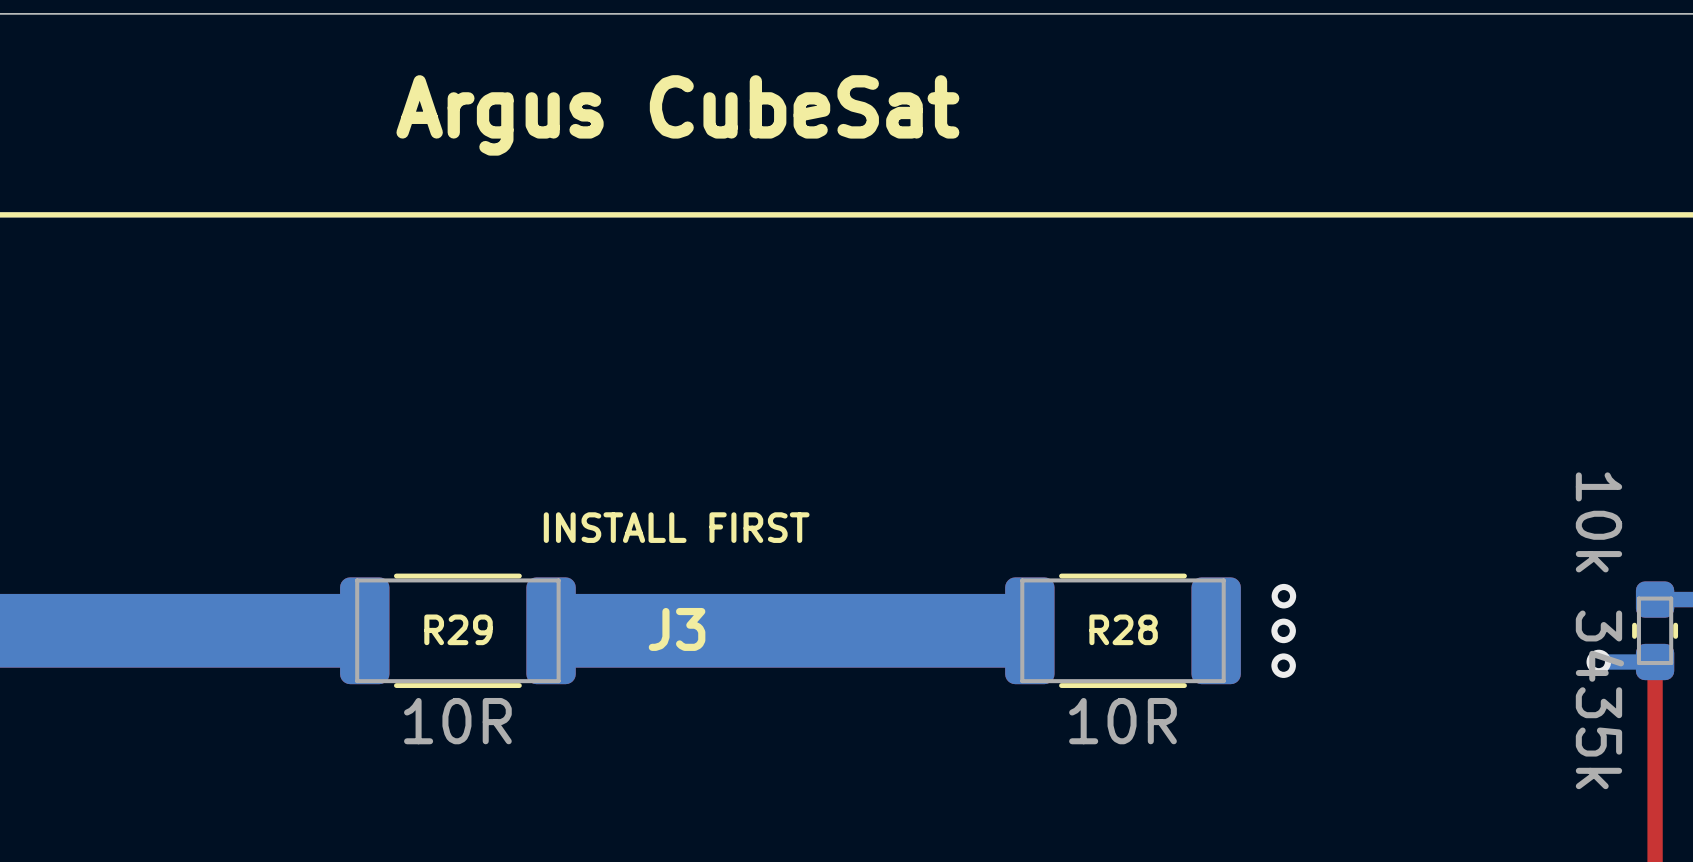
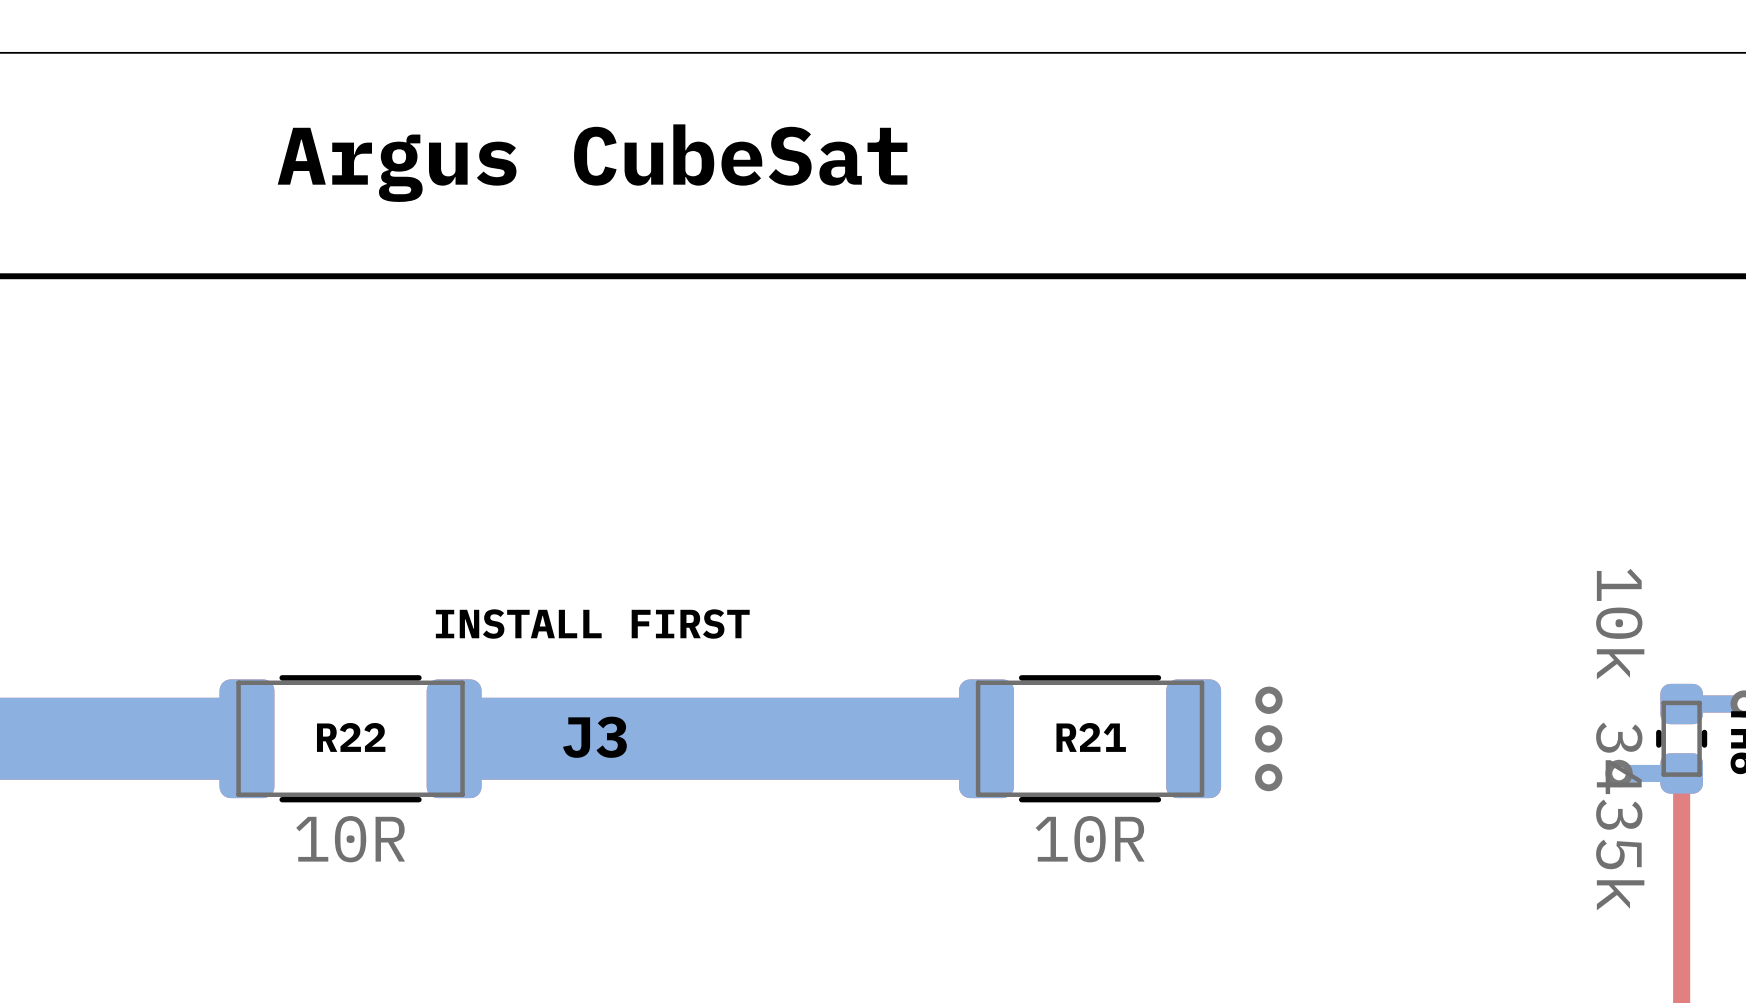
R29 name: R29 (458, 629) -> R22 (351, 737)
R28 name: R28 (1123, 629) -> R21 (1091, 737)

